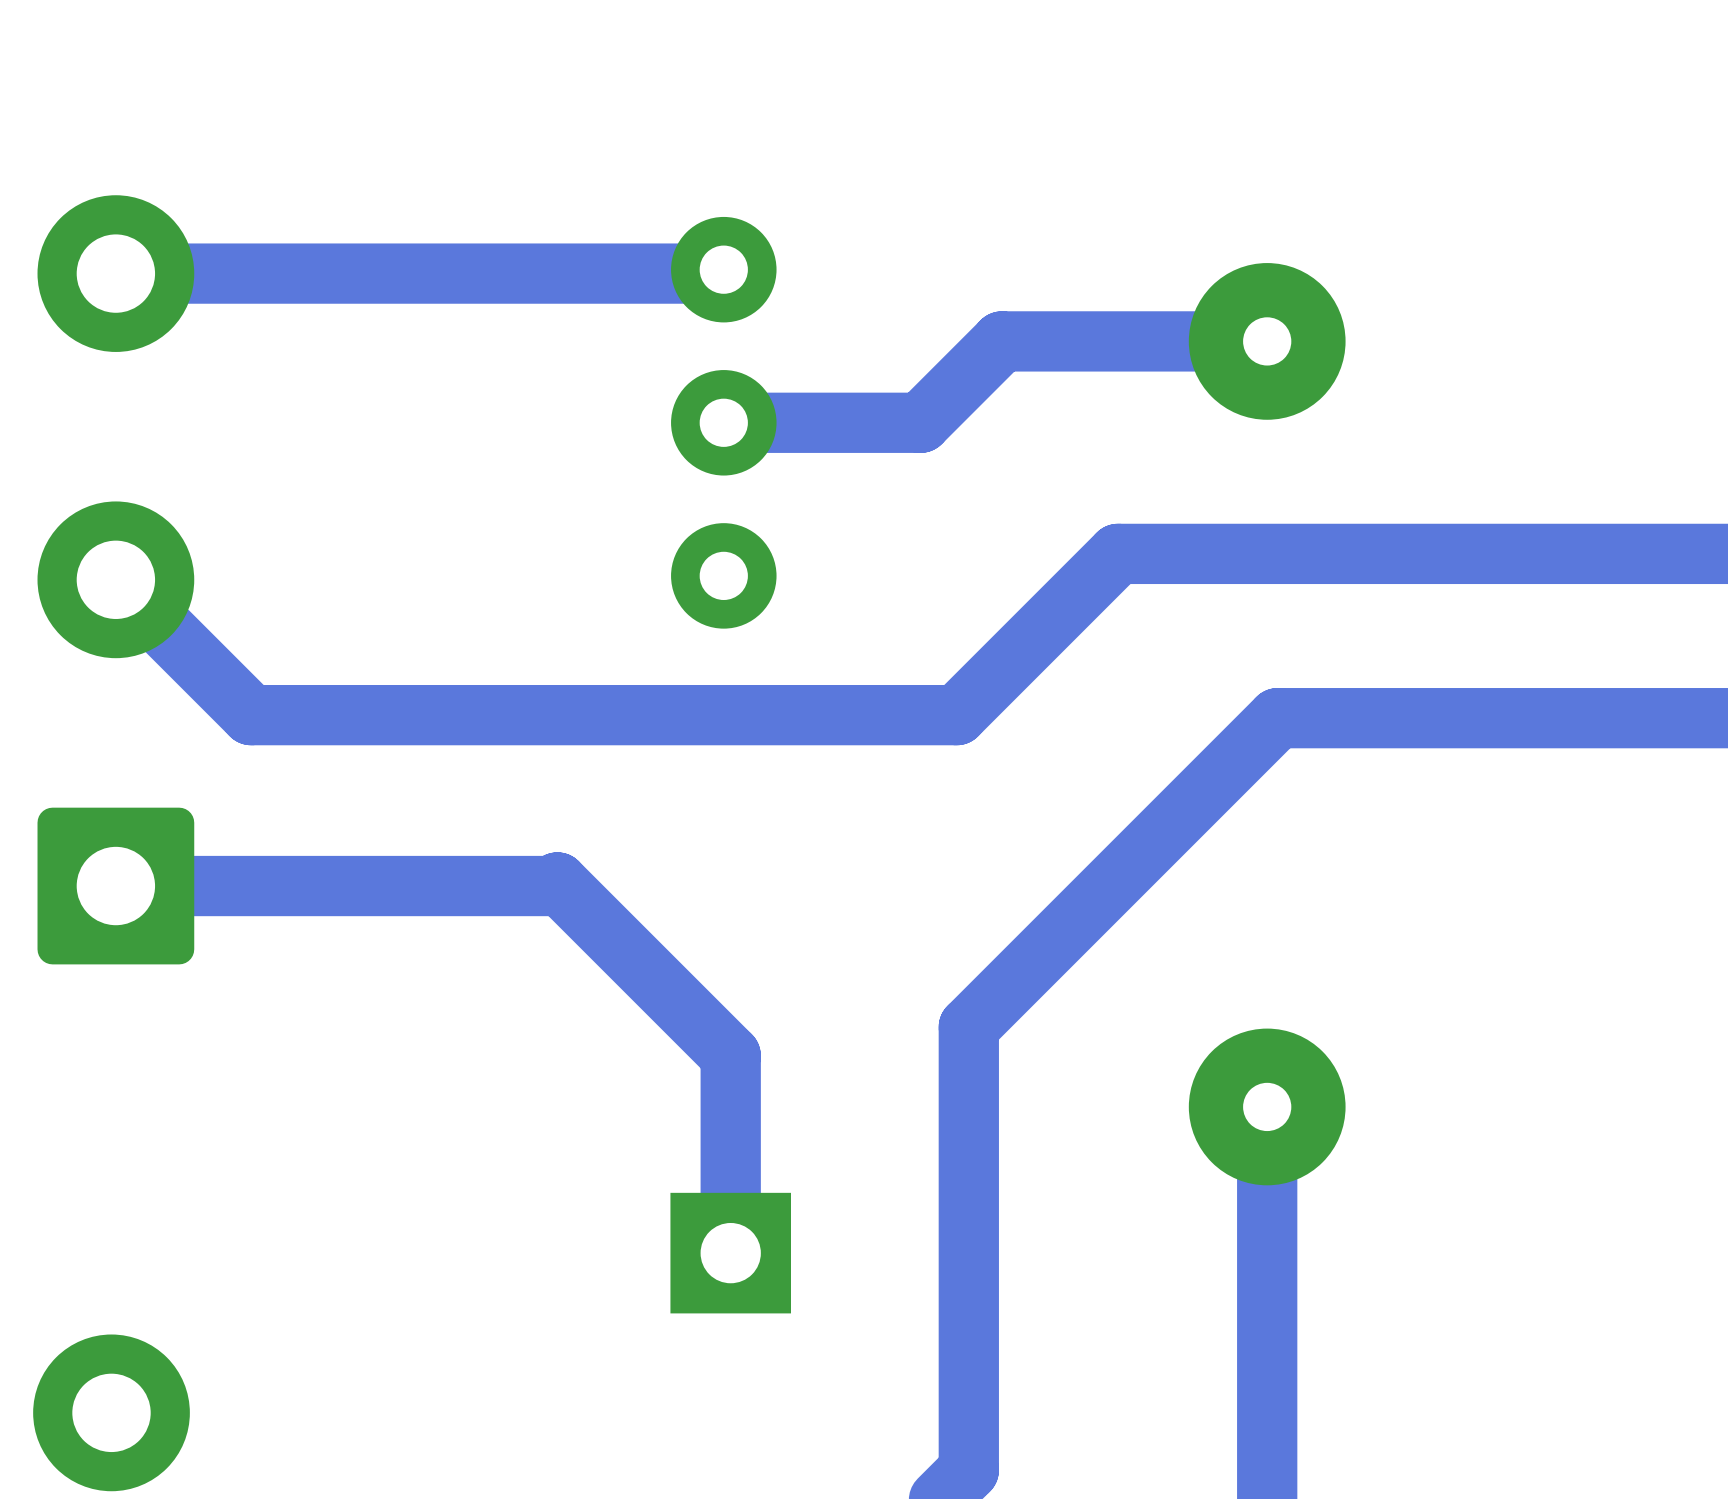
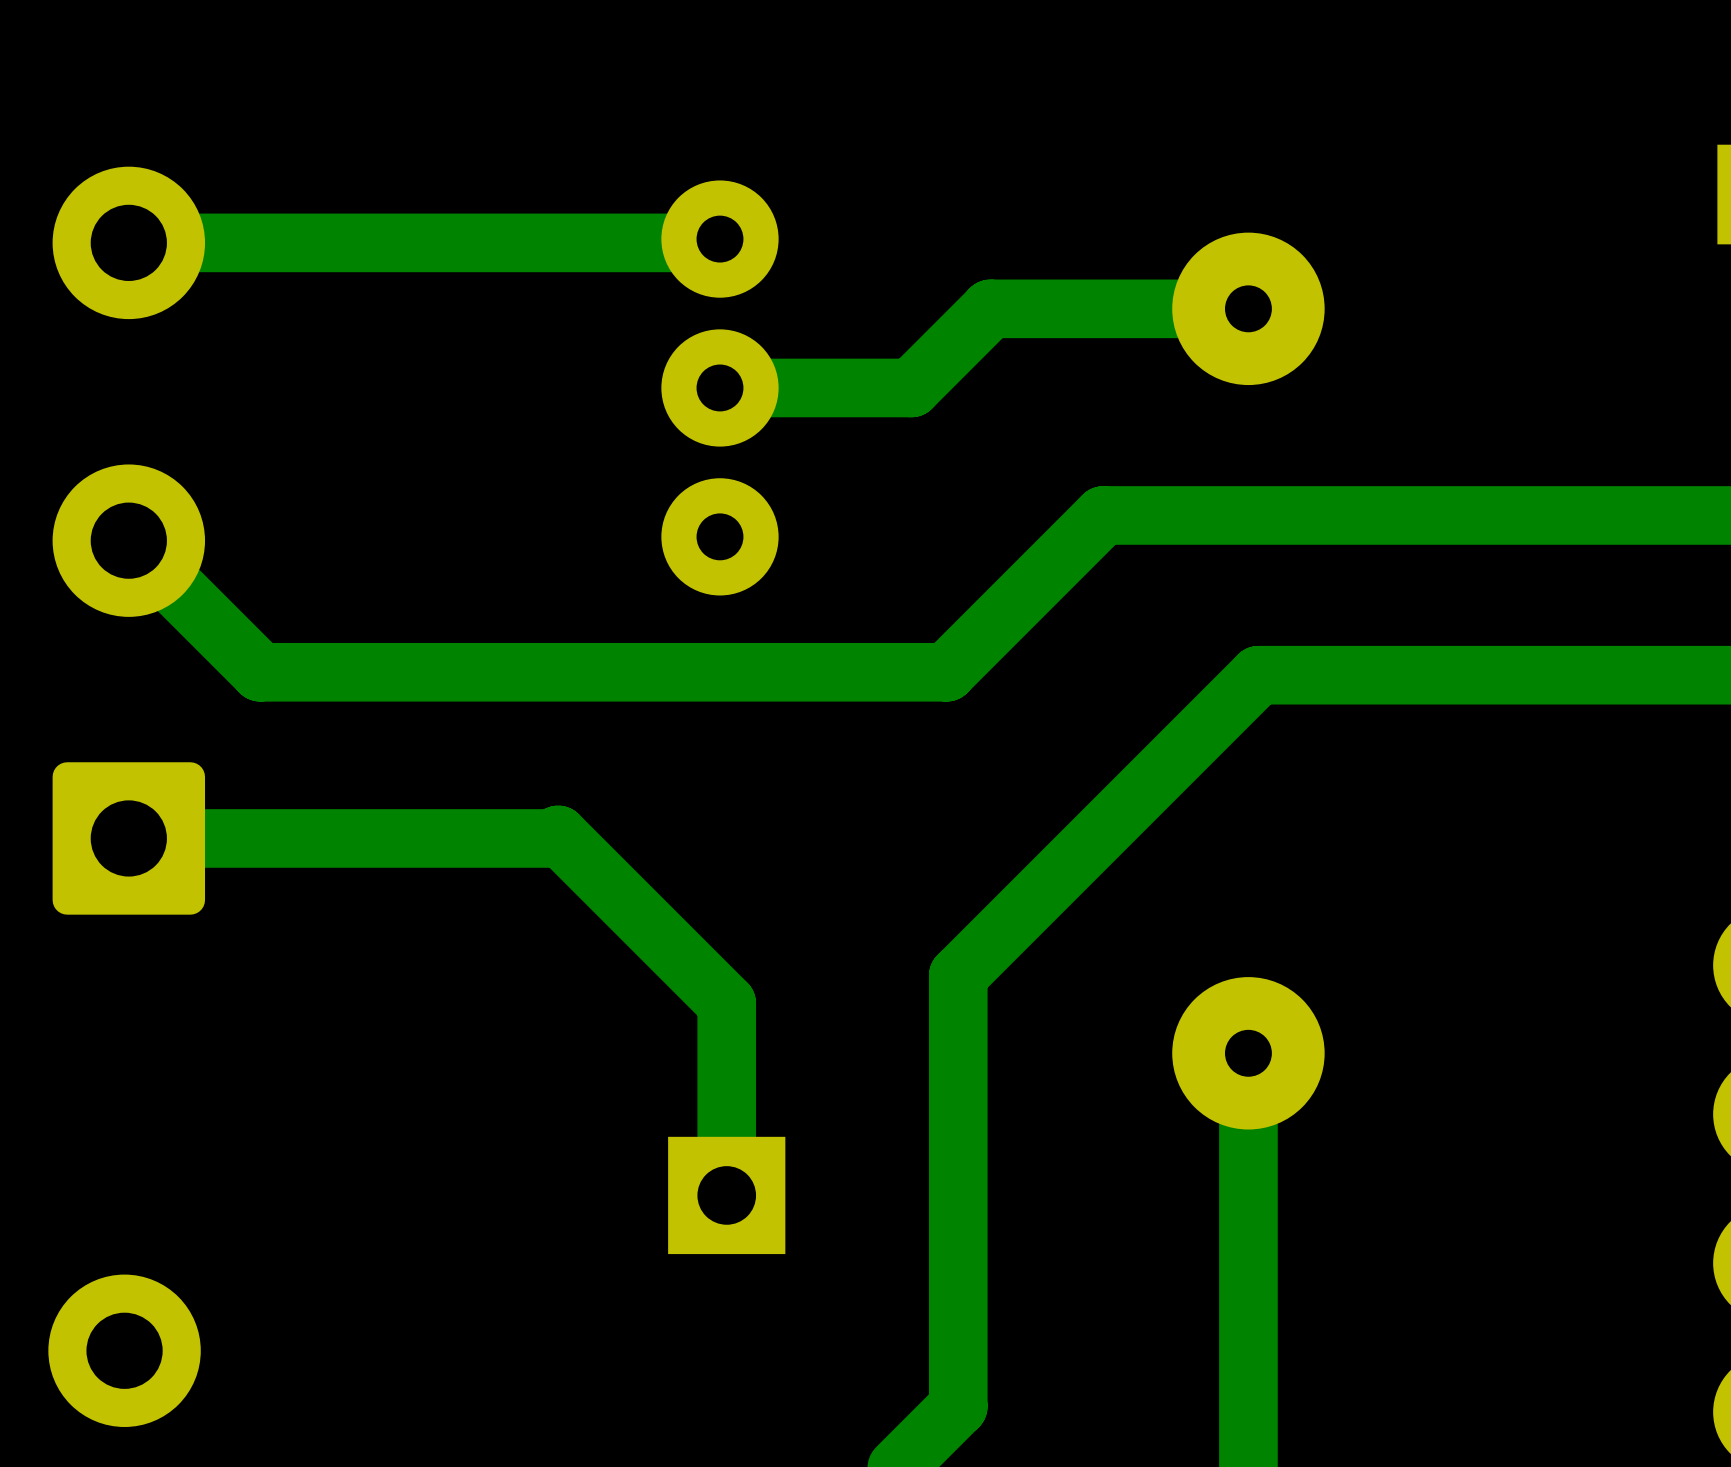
part footprint: [671, 216, 777, 629] -> [661, 180, 779, 596]

